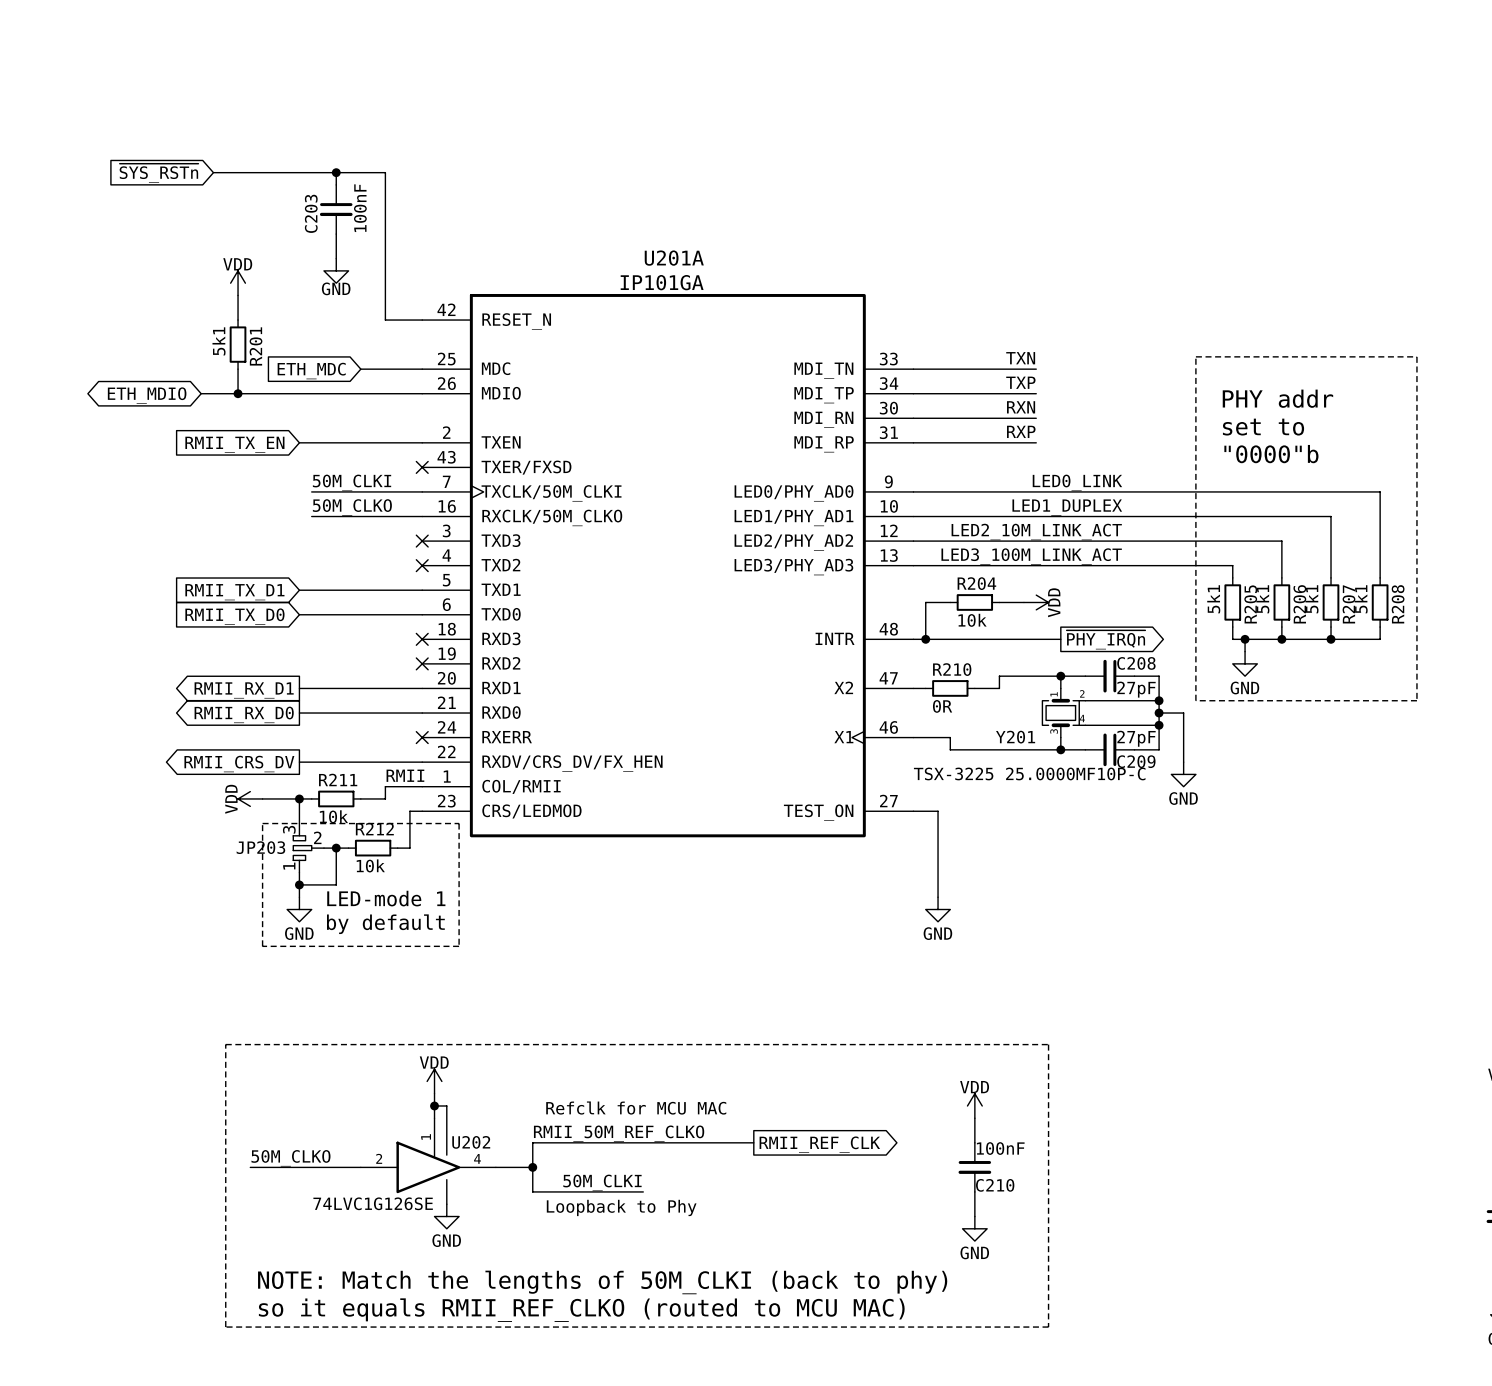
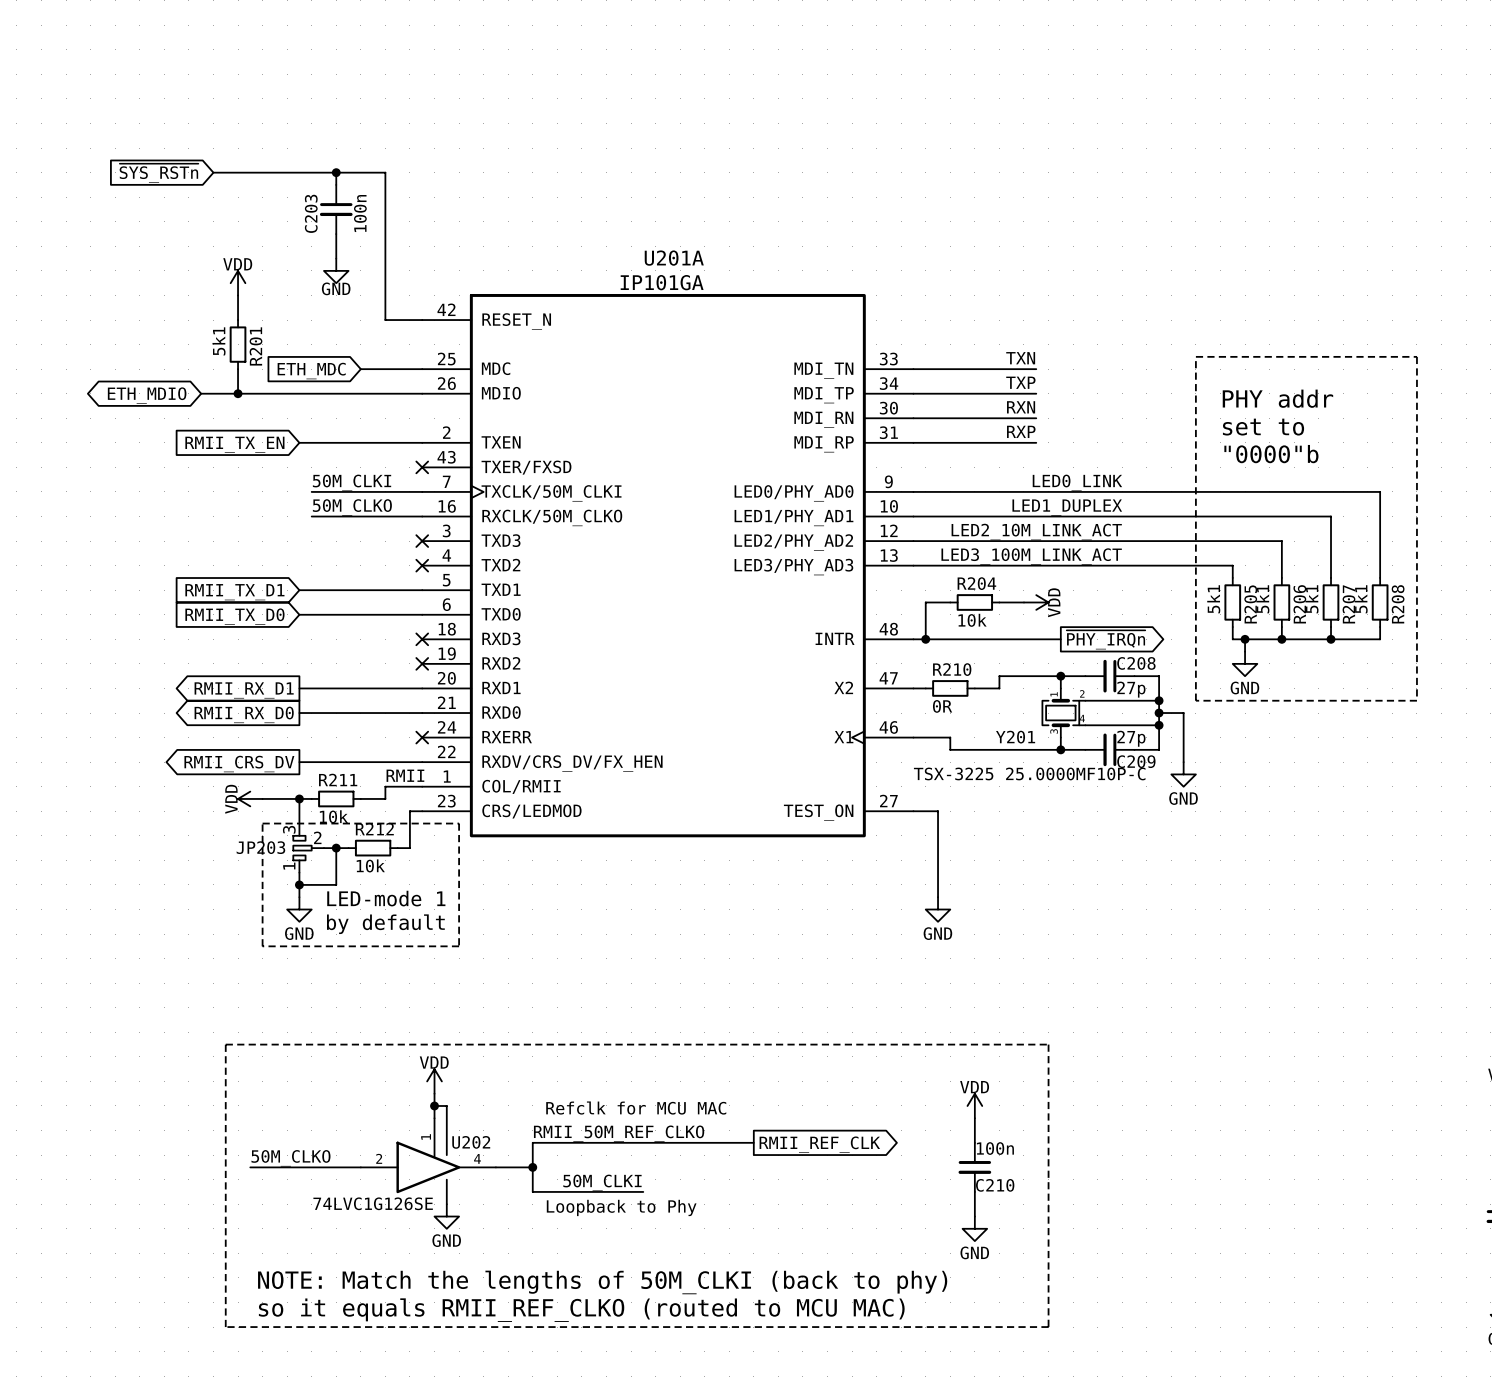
C203 value: 100nF (360, 208) -> 100n (360, 213)
C208 value: 27pF (1136, 689) -> 27p (1131, 689)
C209 value: 27pF (1136, 738) -> 27p (1131, 738)
C210 value: 100nF (1000, 1148) -> 100n (995, 1148)

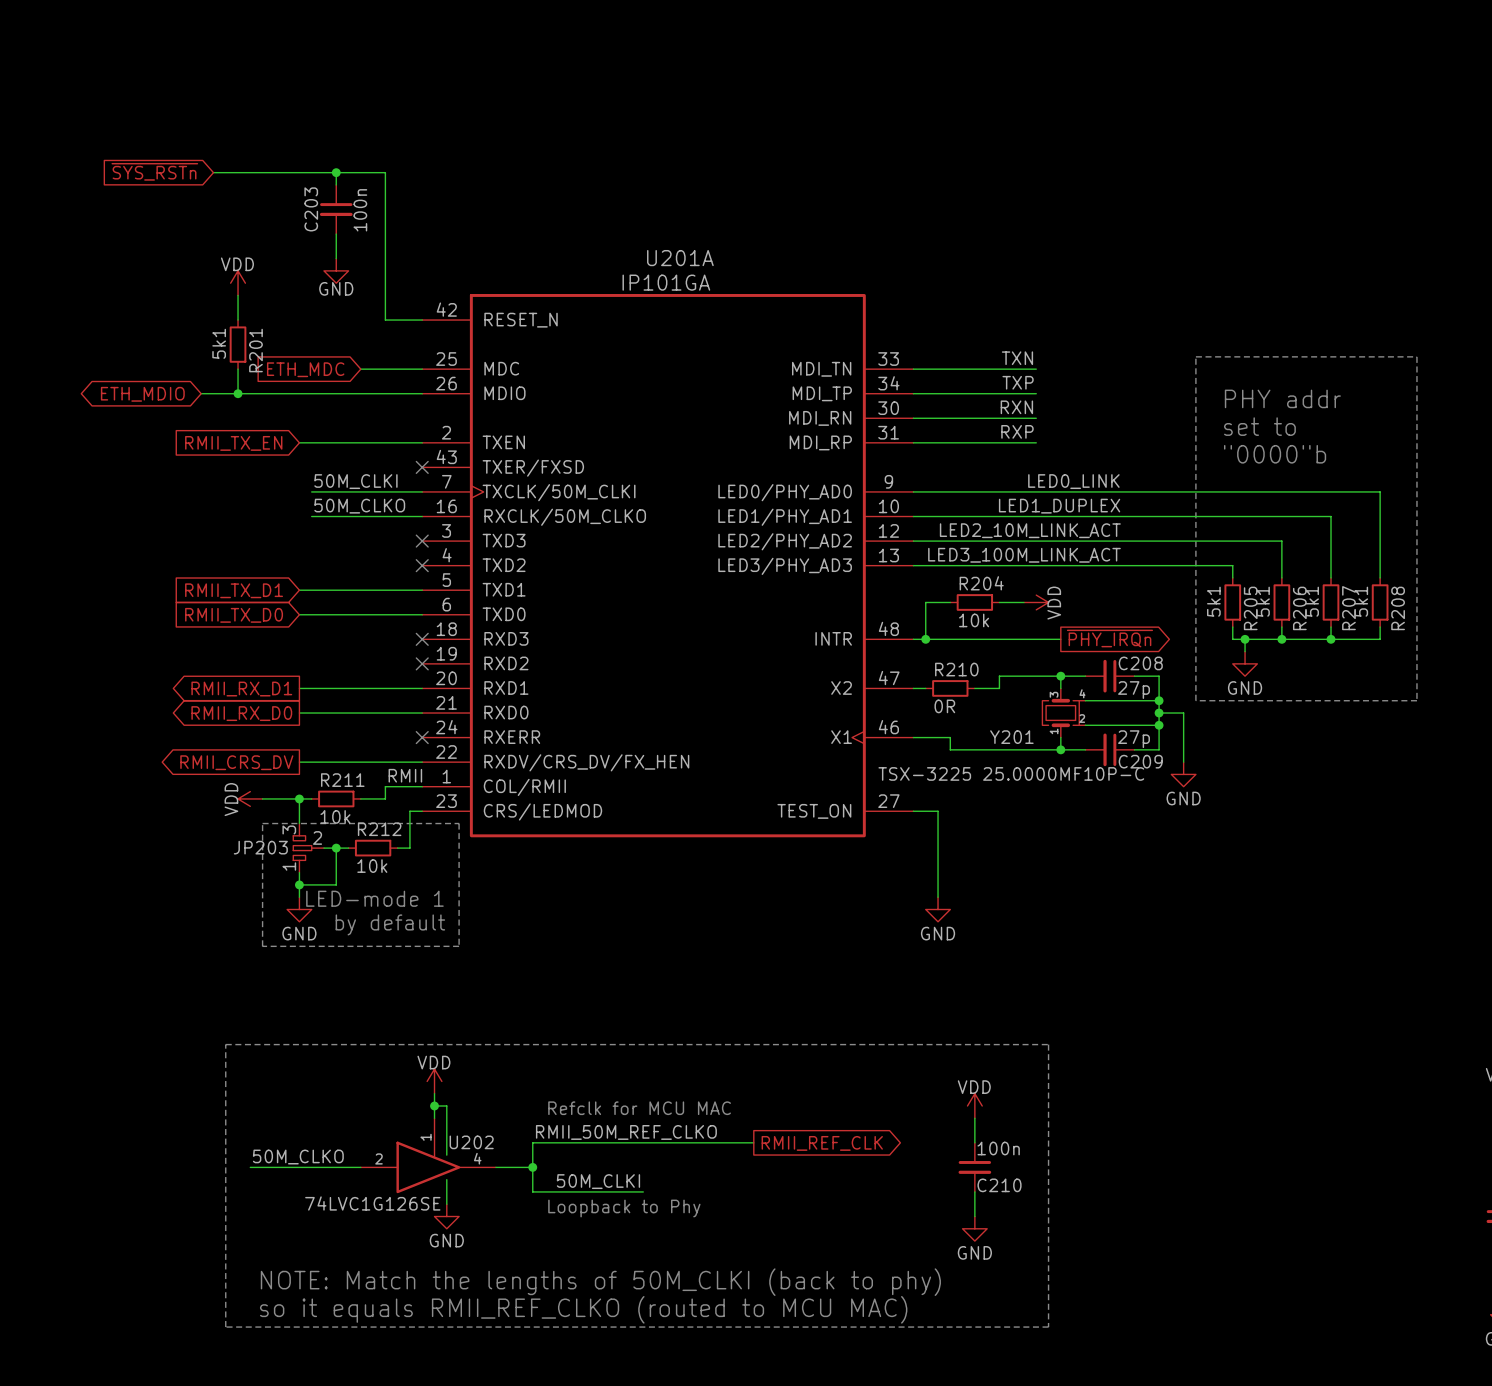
Y201 flip: as is (1060, 713) -> up-down (1060, 713)

